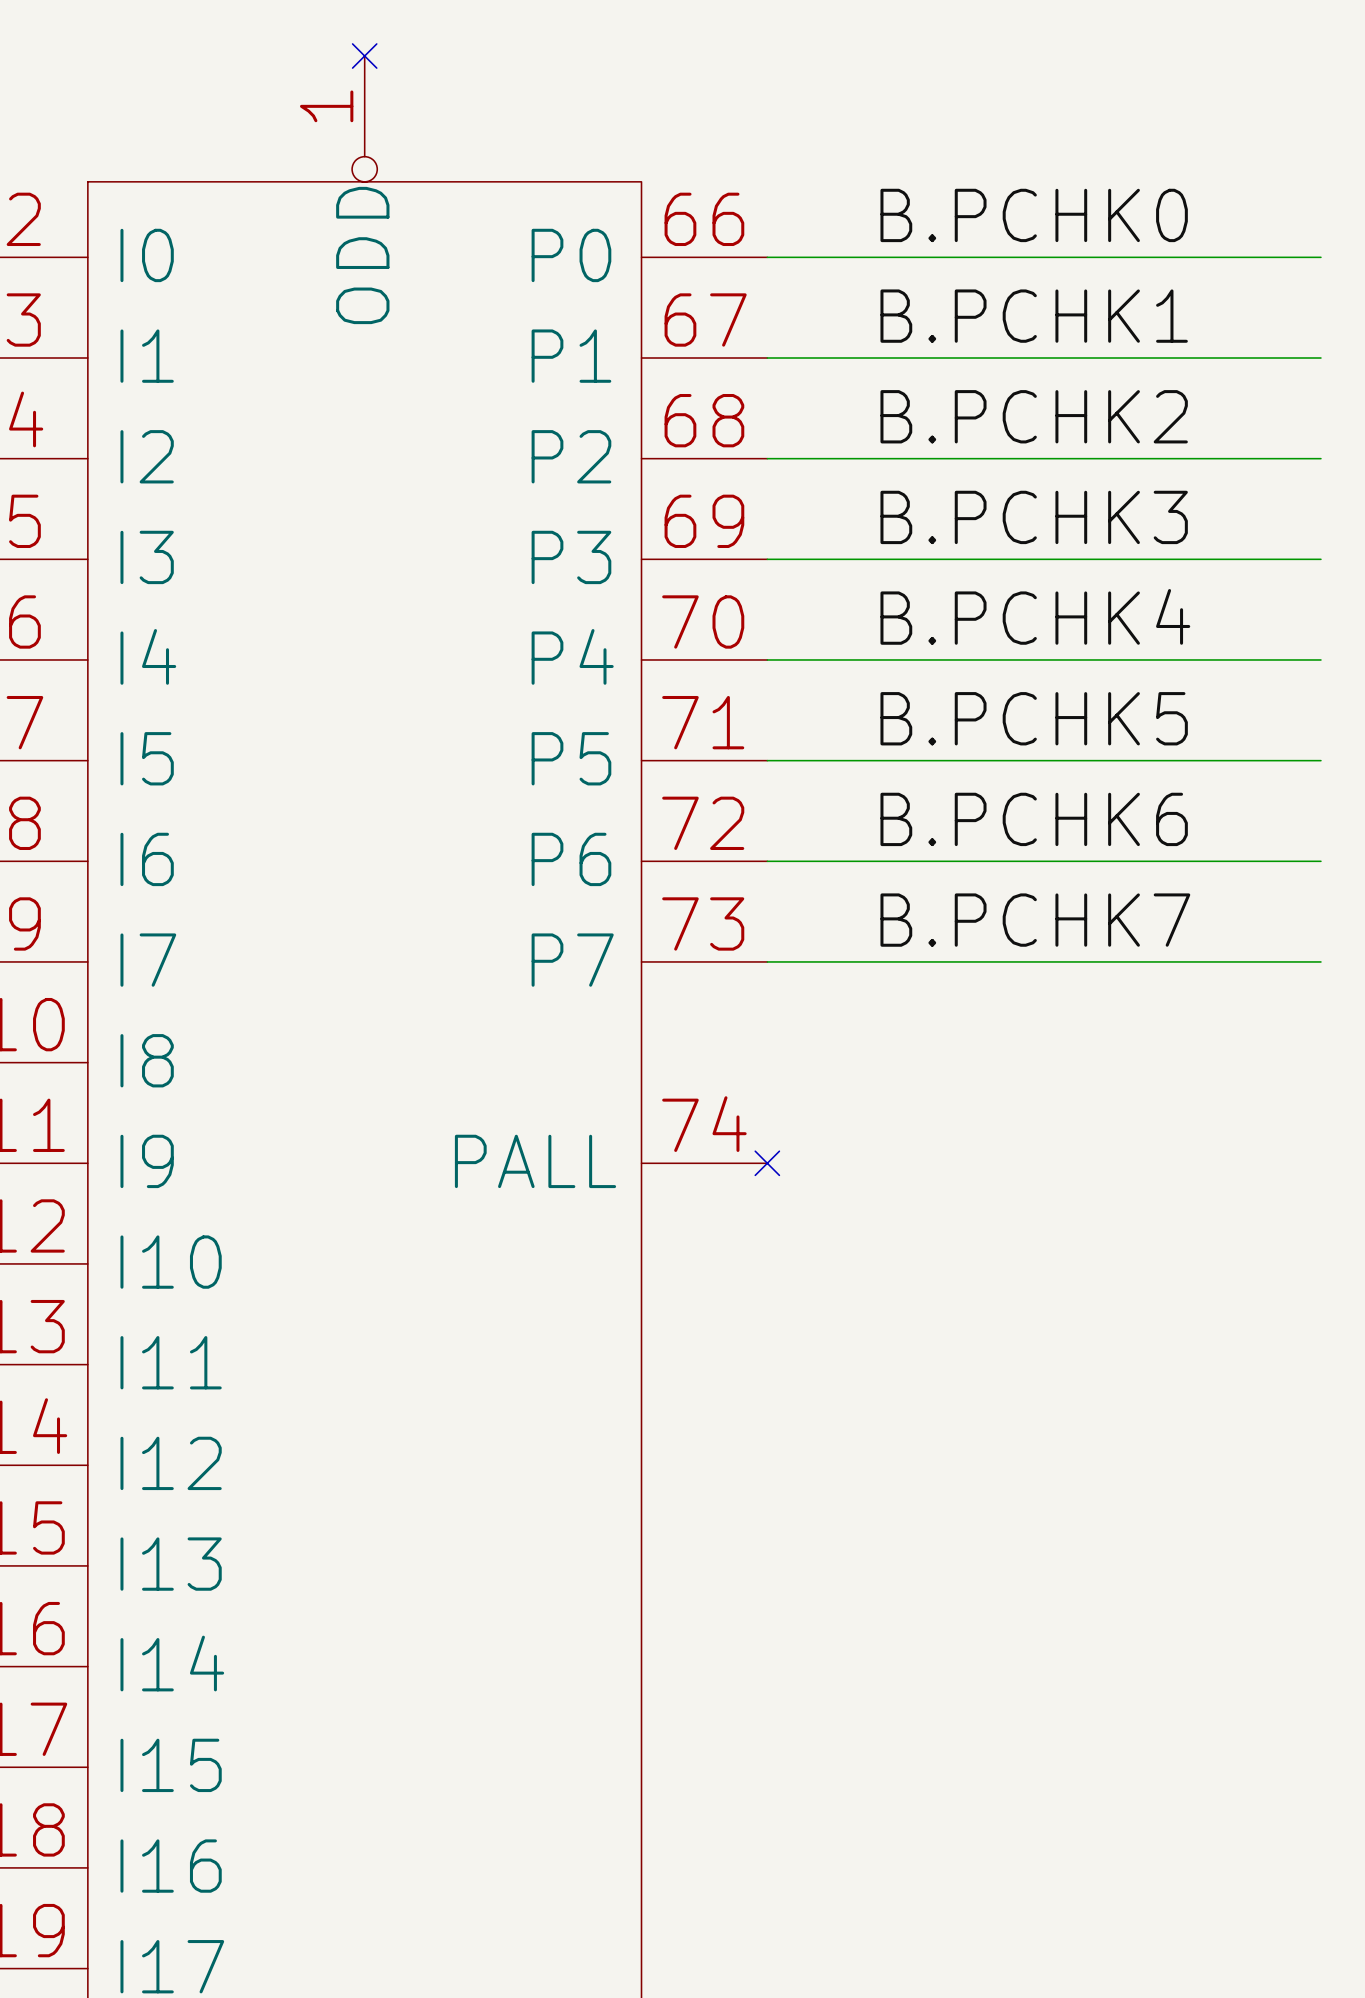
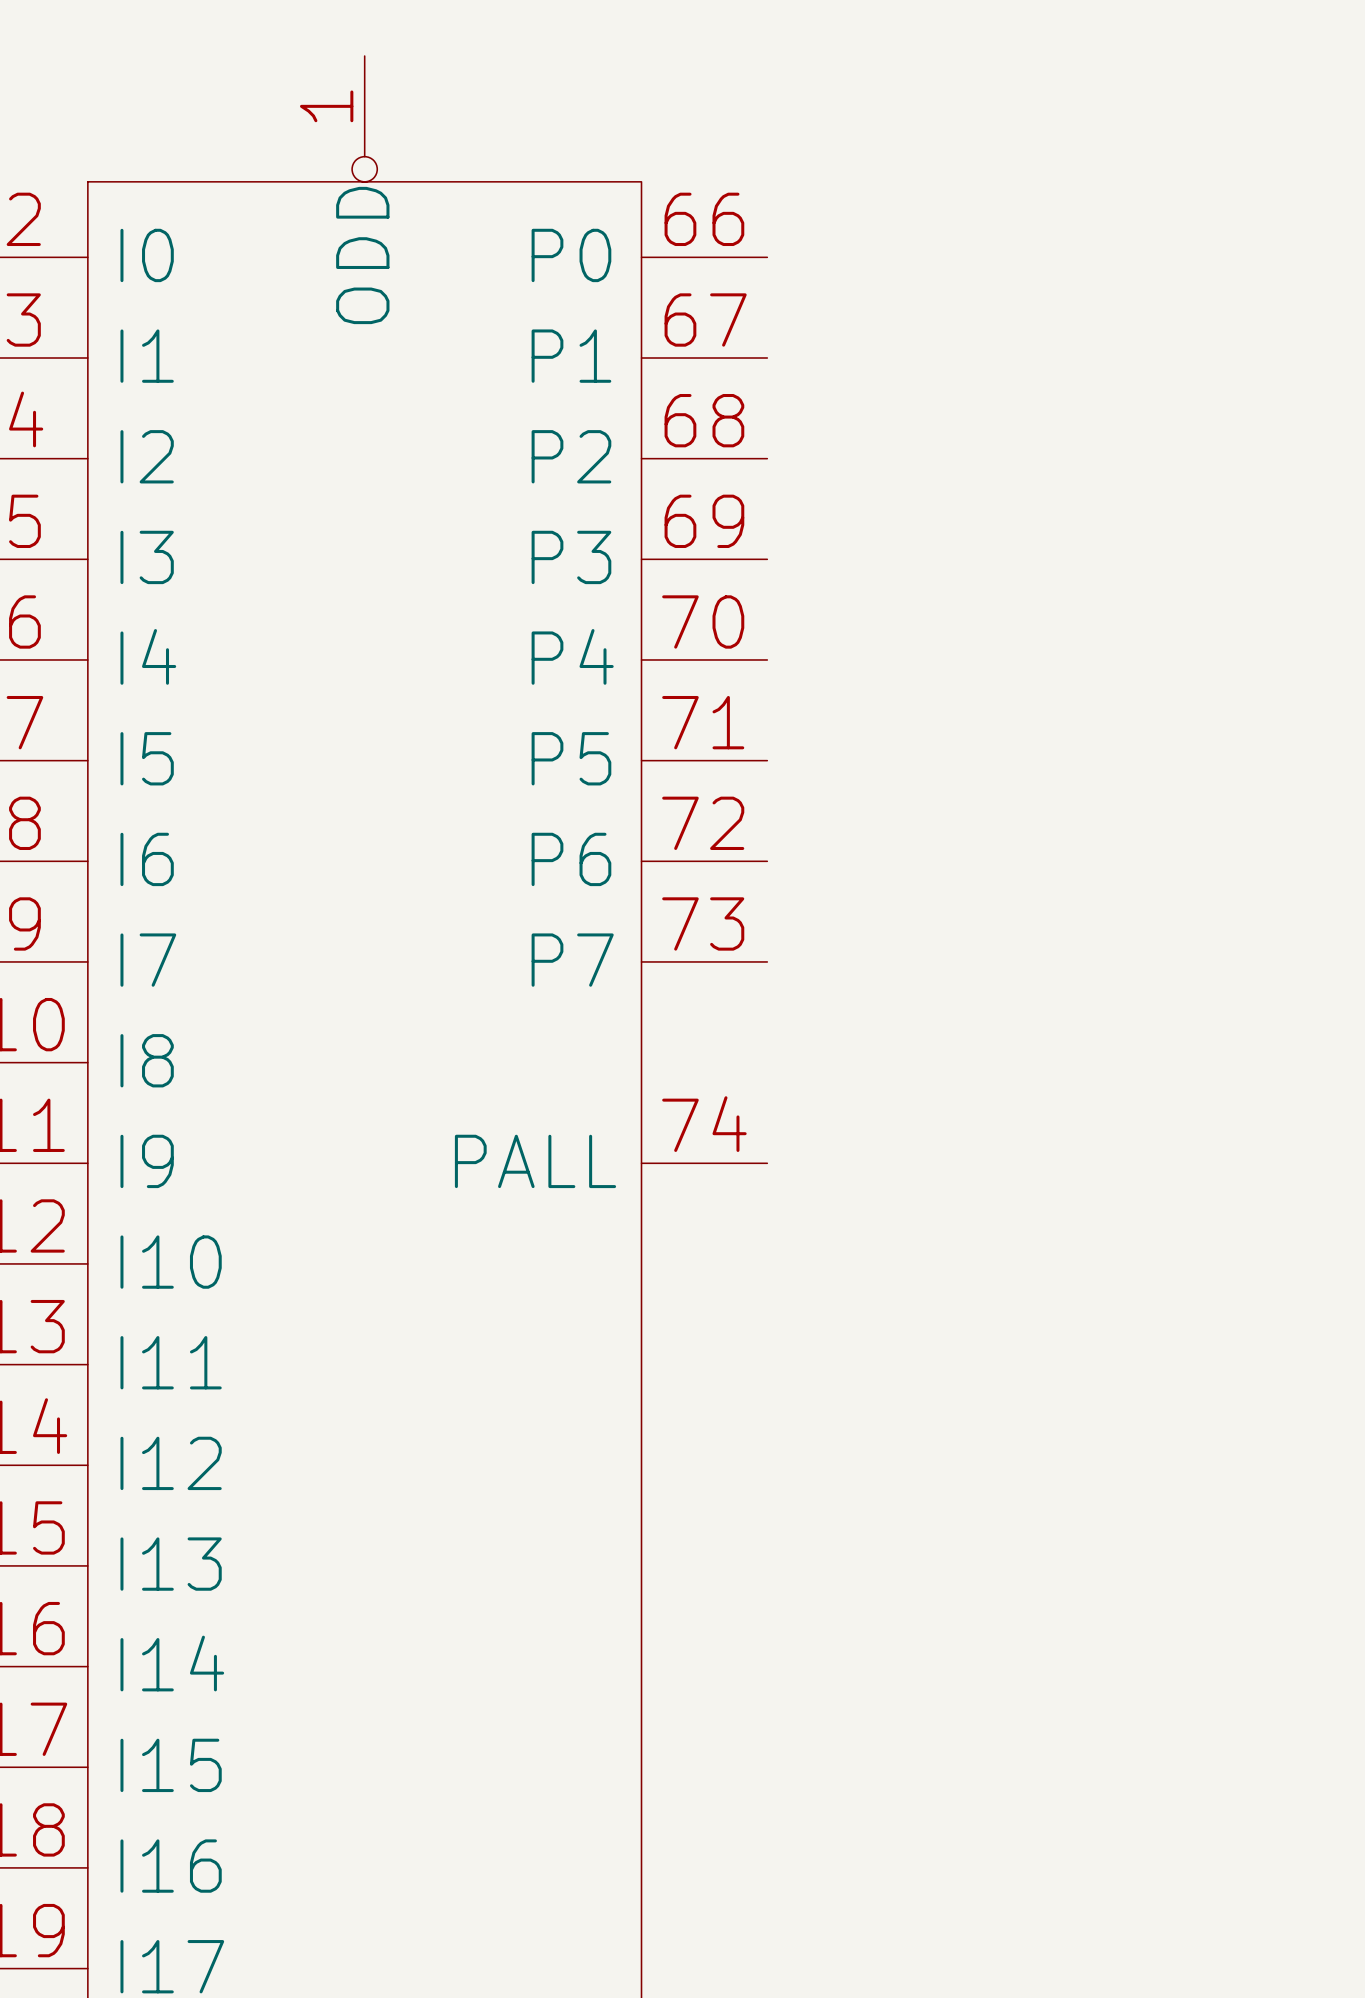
no-connect mark: (364, 56) -> none
label: B.PCHK0 (1034, 215) -> none
wire: (767, 257) (1320, 257) -> none
label: B.PCHK1 (1034, 316) -> none
wire: (767, 358) (1320, 358) -> none
label: B.PCHK2 (1034, 416) -> none
wire: (767, 458) (1320, 458) -> none
label: B.PCHK3 (1034, 517) -> none
wire: (767, 559) (1320, 559) -> none
label: B.PCHK4 (1035, 616) -> none
wire: (767, 659) (1320, 659) -> none
label: B.PCHK5 (1034, 718) -> none
wire: (767, 760) (1320, 760) -> none
label: B.PCHK6 (1034, 819) -> none
wire: (767, 861) (1320, 861) -> none
label: B.PCHK7 (1035, 920) -> none
wire: (767, 961) (1320, 961) -> none
no-connect mark: (767, 1163) -> none

